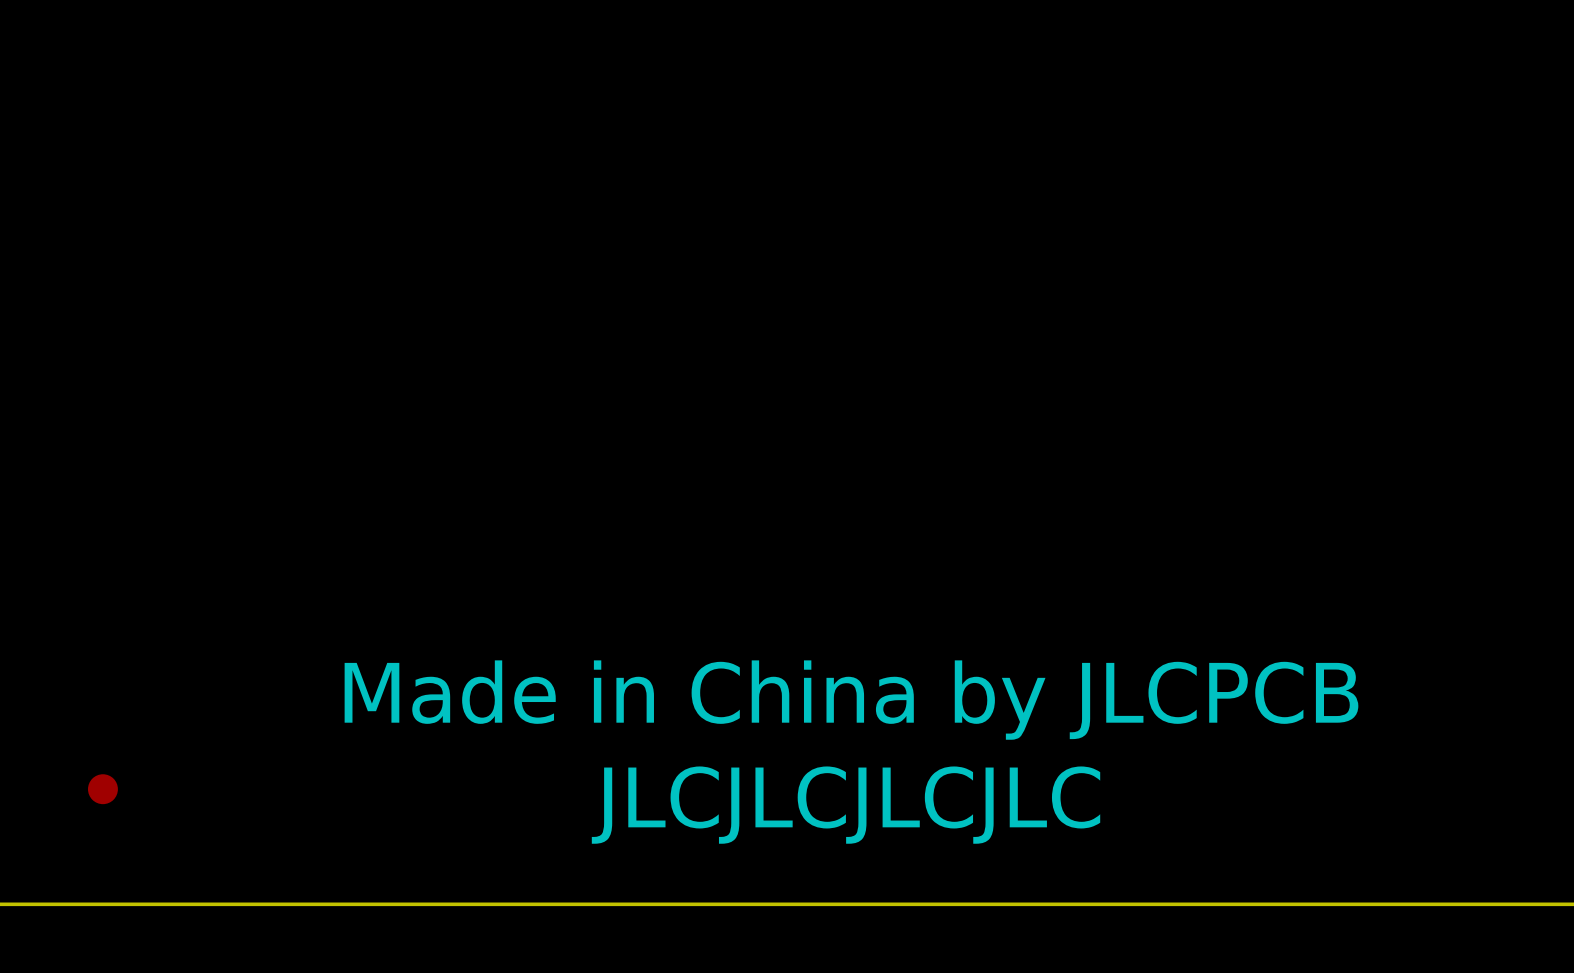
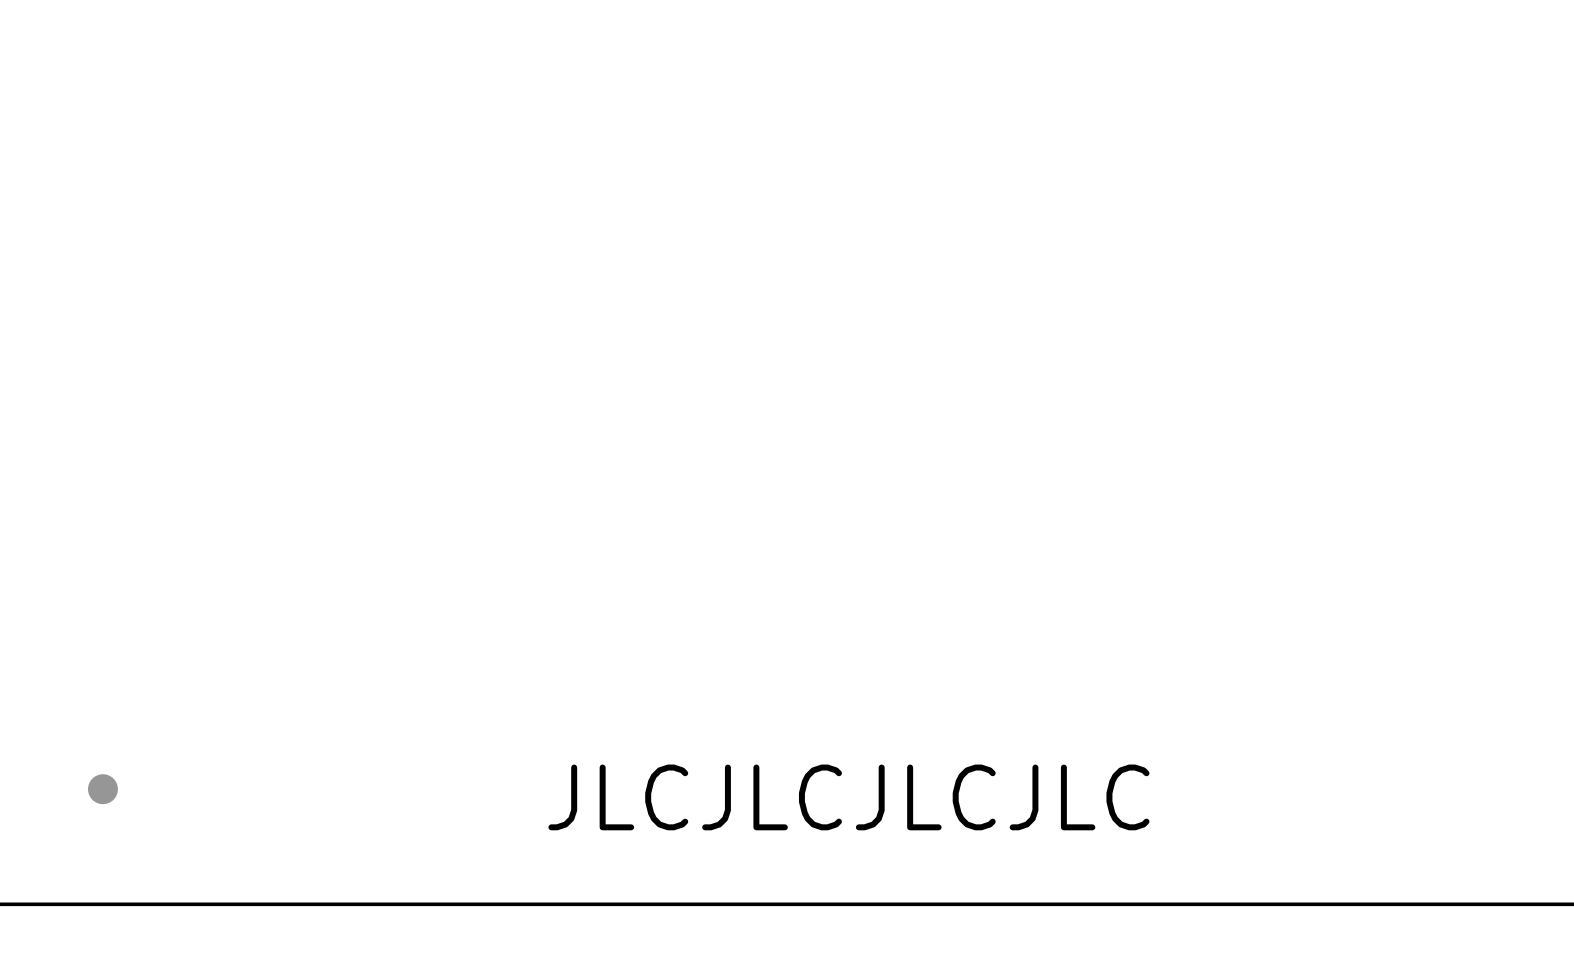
text: Made in China by JLCPCB (851, 700) -> none

